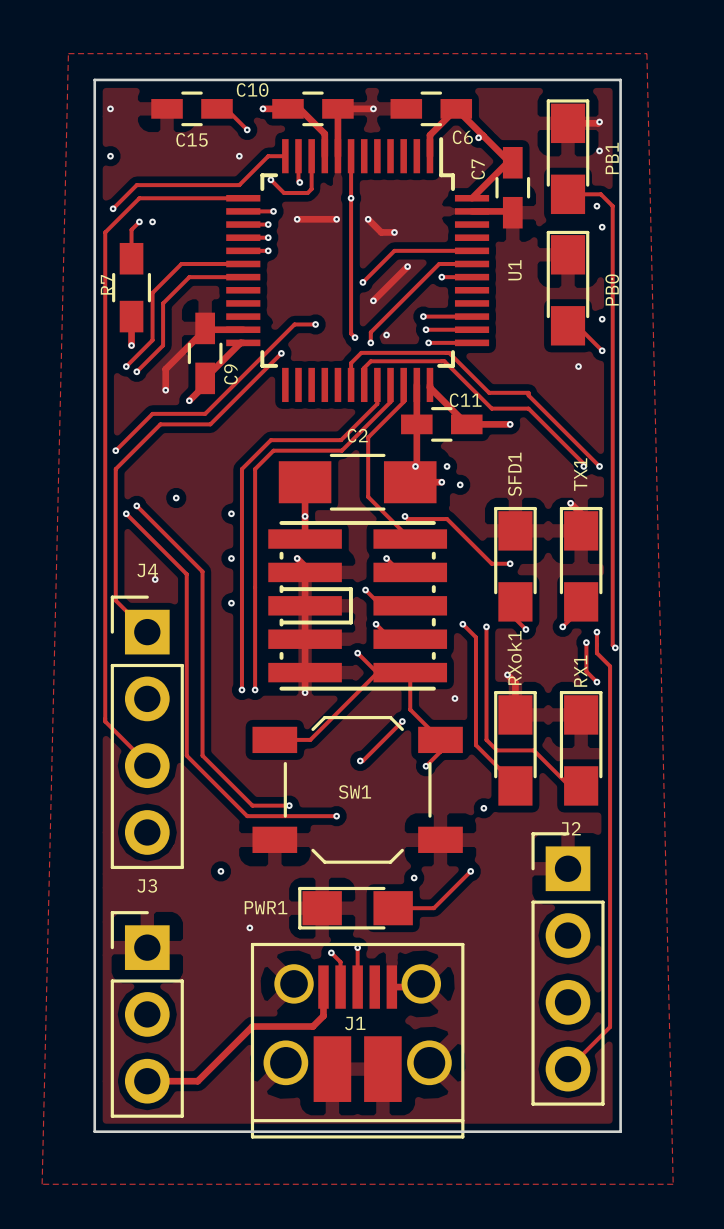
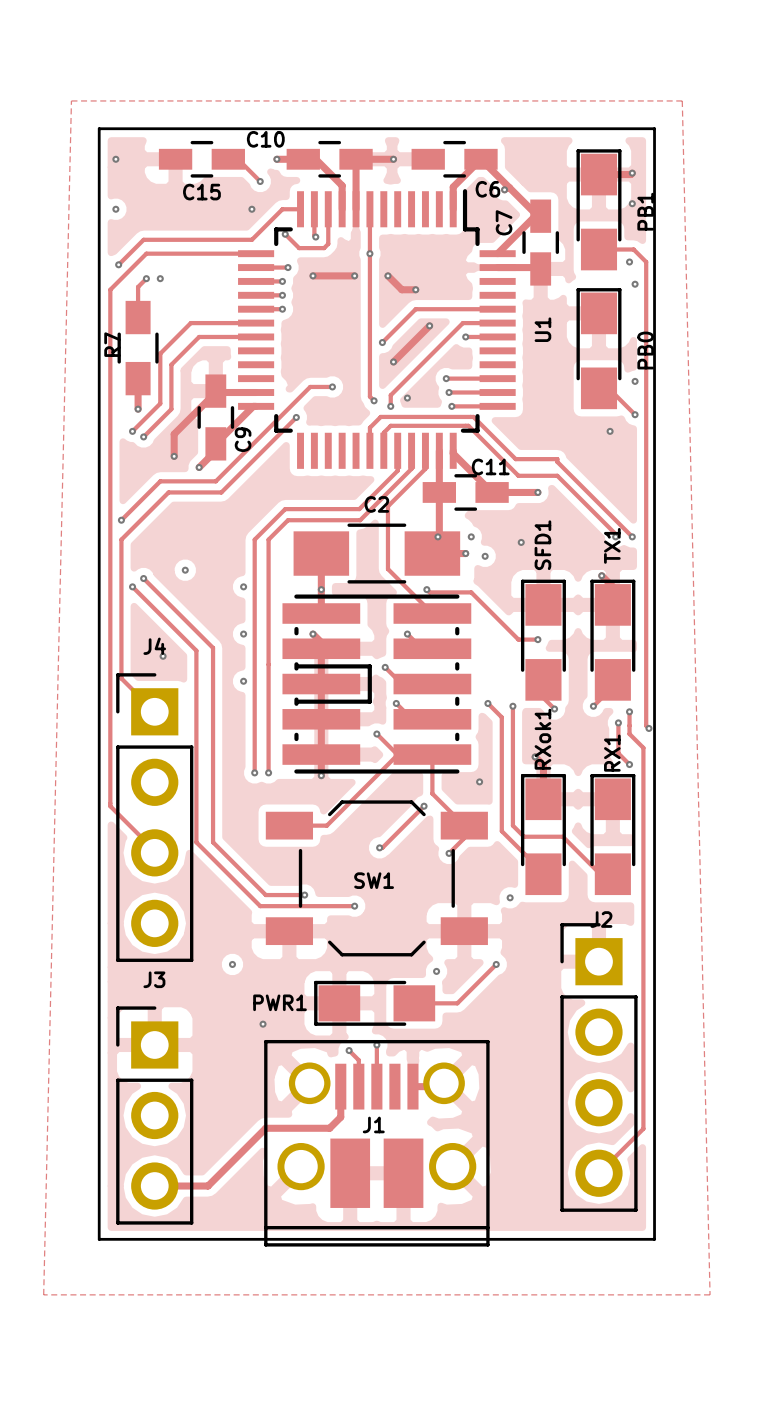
via: none -> (521, 542)

